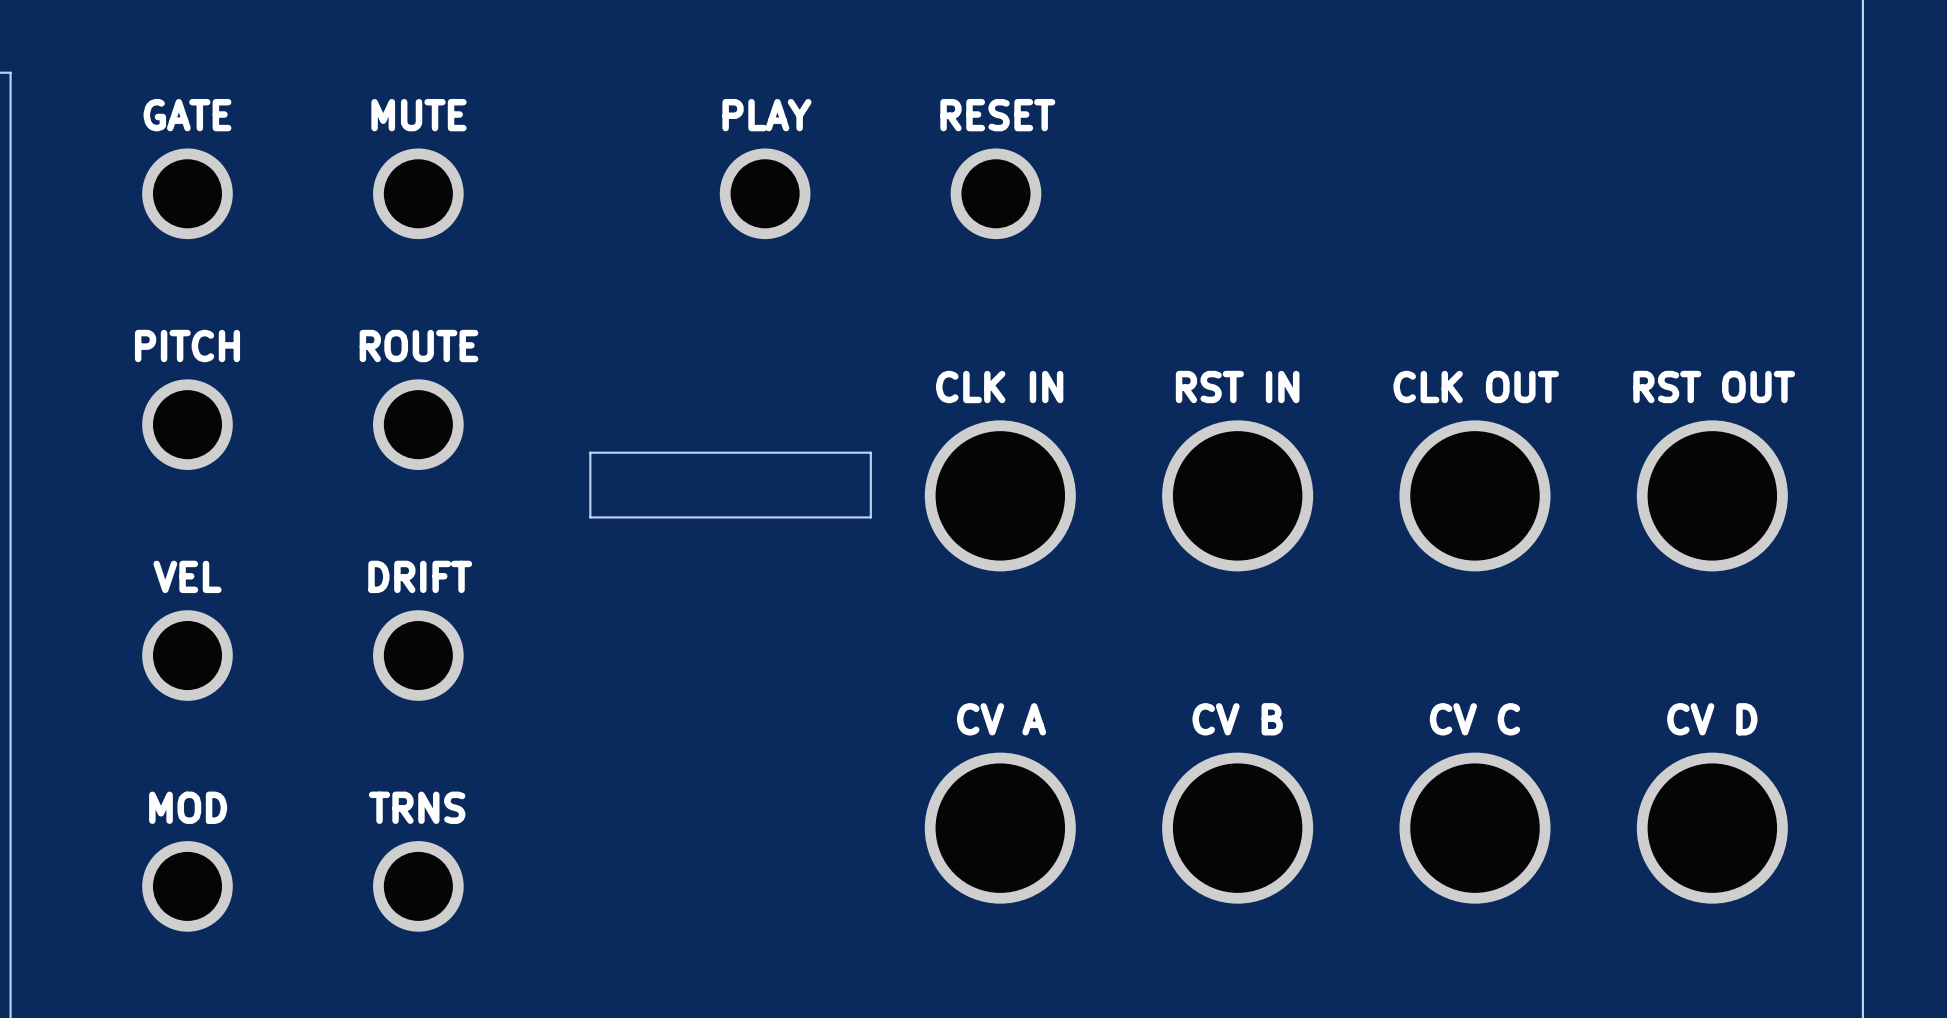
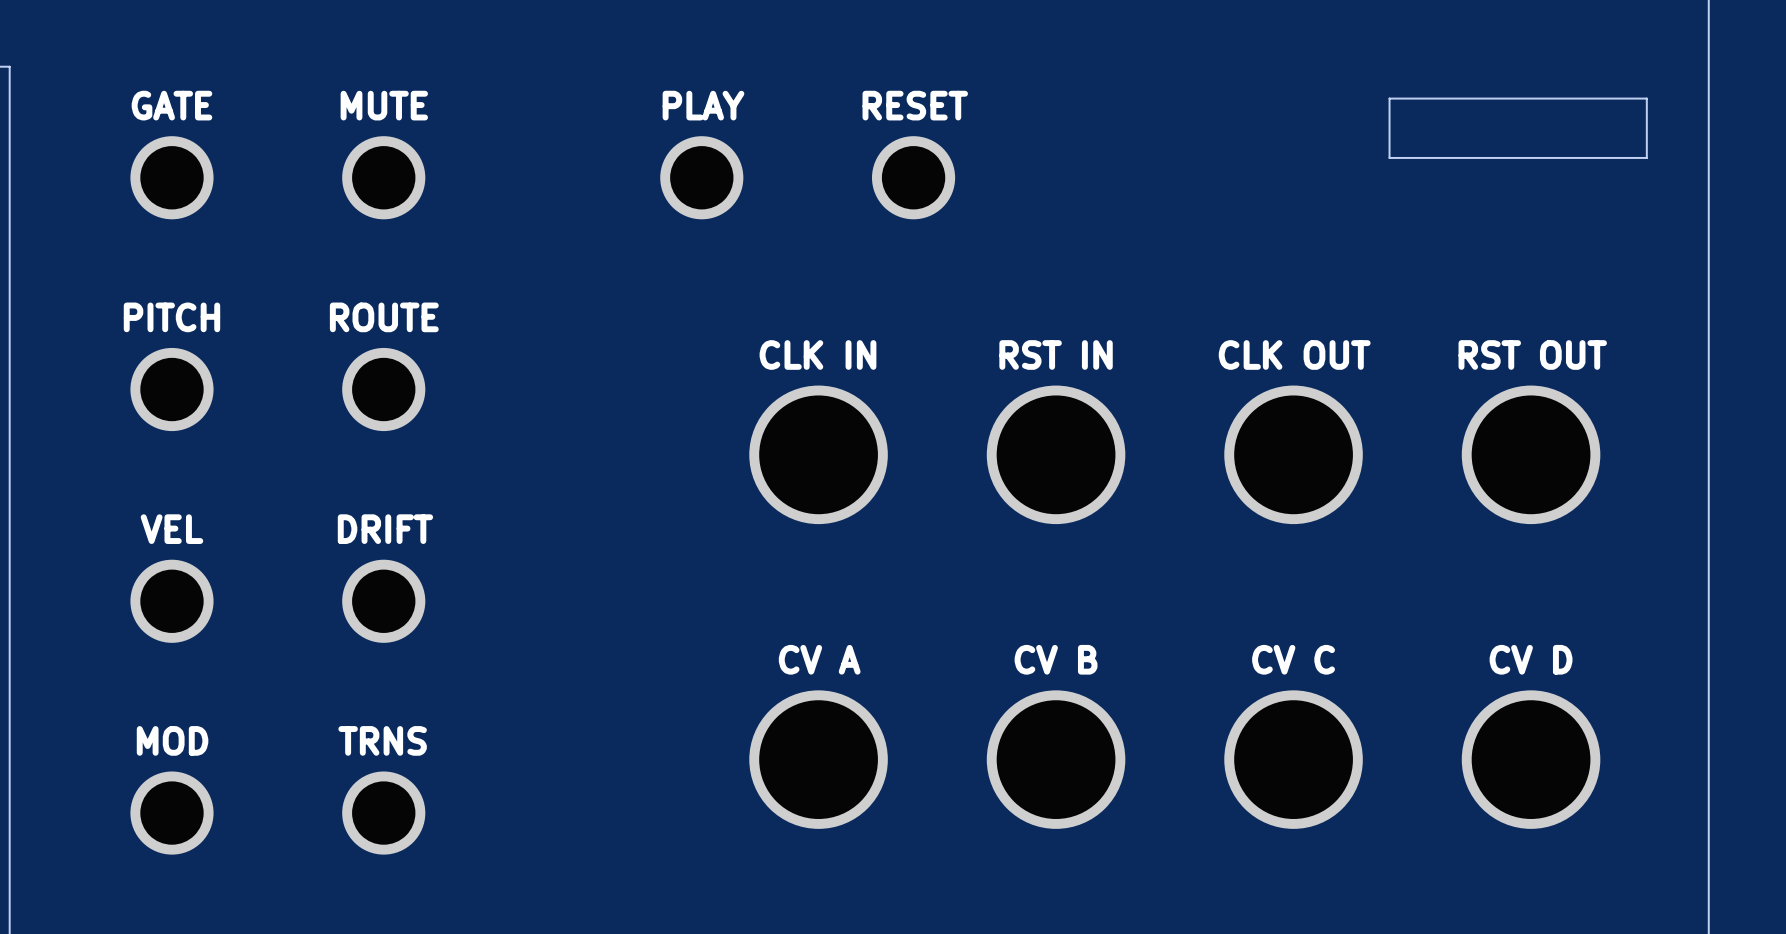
board edge: none -> (1389, 98) (1646, 98) (1646, 157) (1389, 157) (1389, 98)
board edge: (590, 452) (870, 452) (870, 517) (590, 517) (590, 452) -> none
part position: (1000, 495) -> (818, 454)
part position: (1237, 495) -> (1056, 454)
part position: (1474, 495) -> (1293, 454)
part position: (1712, 495) -> (1531, 454)
part position: (1000, 828) -> (818, 759)
part position: (1237, 828) -> (1056, 759)
part position: (1474, 828) -> (1293, 759)
part position: (1712, 828) -> (1531, 759)

